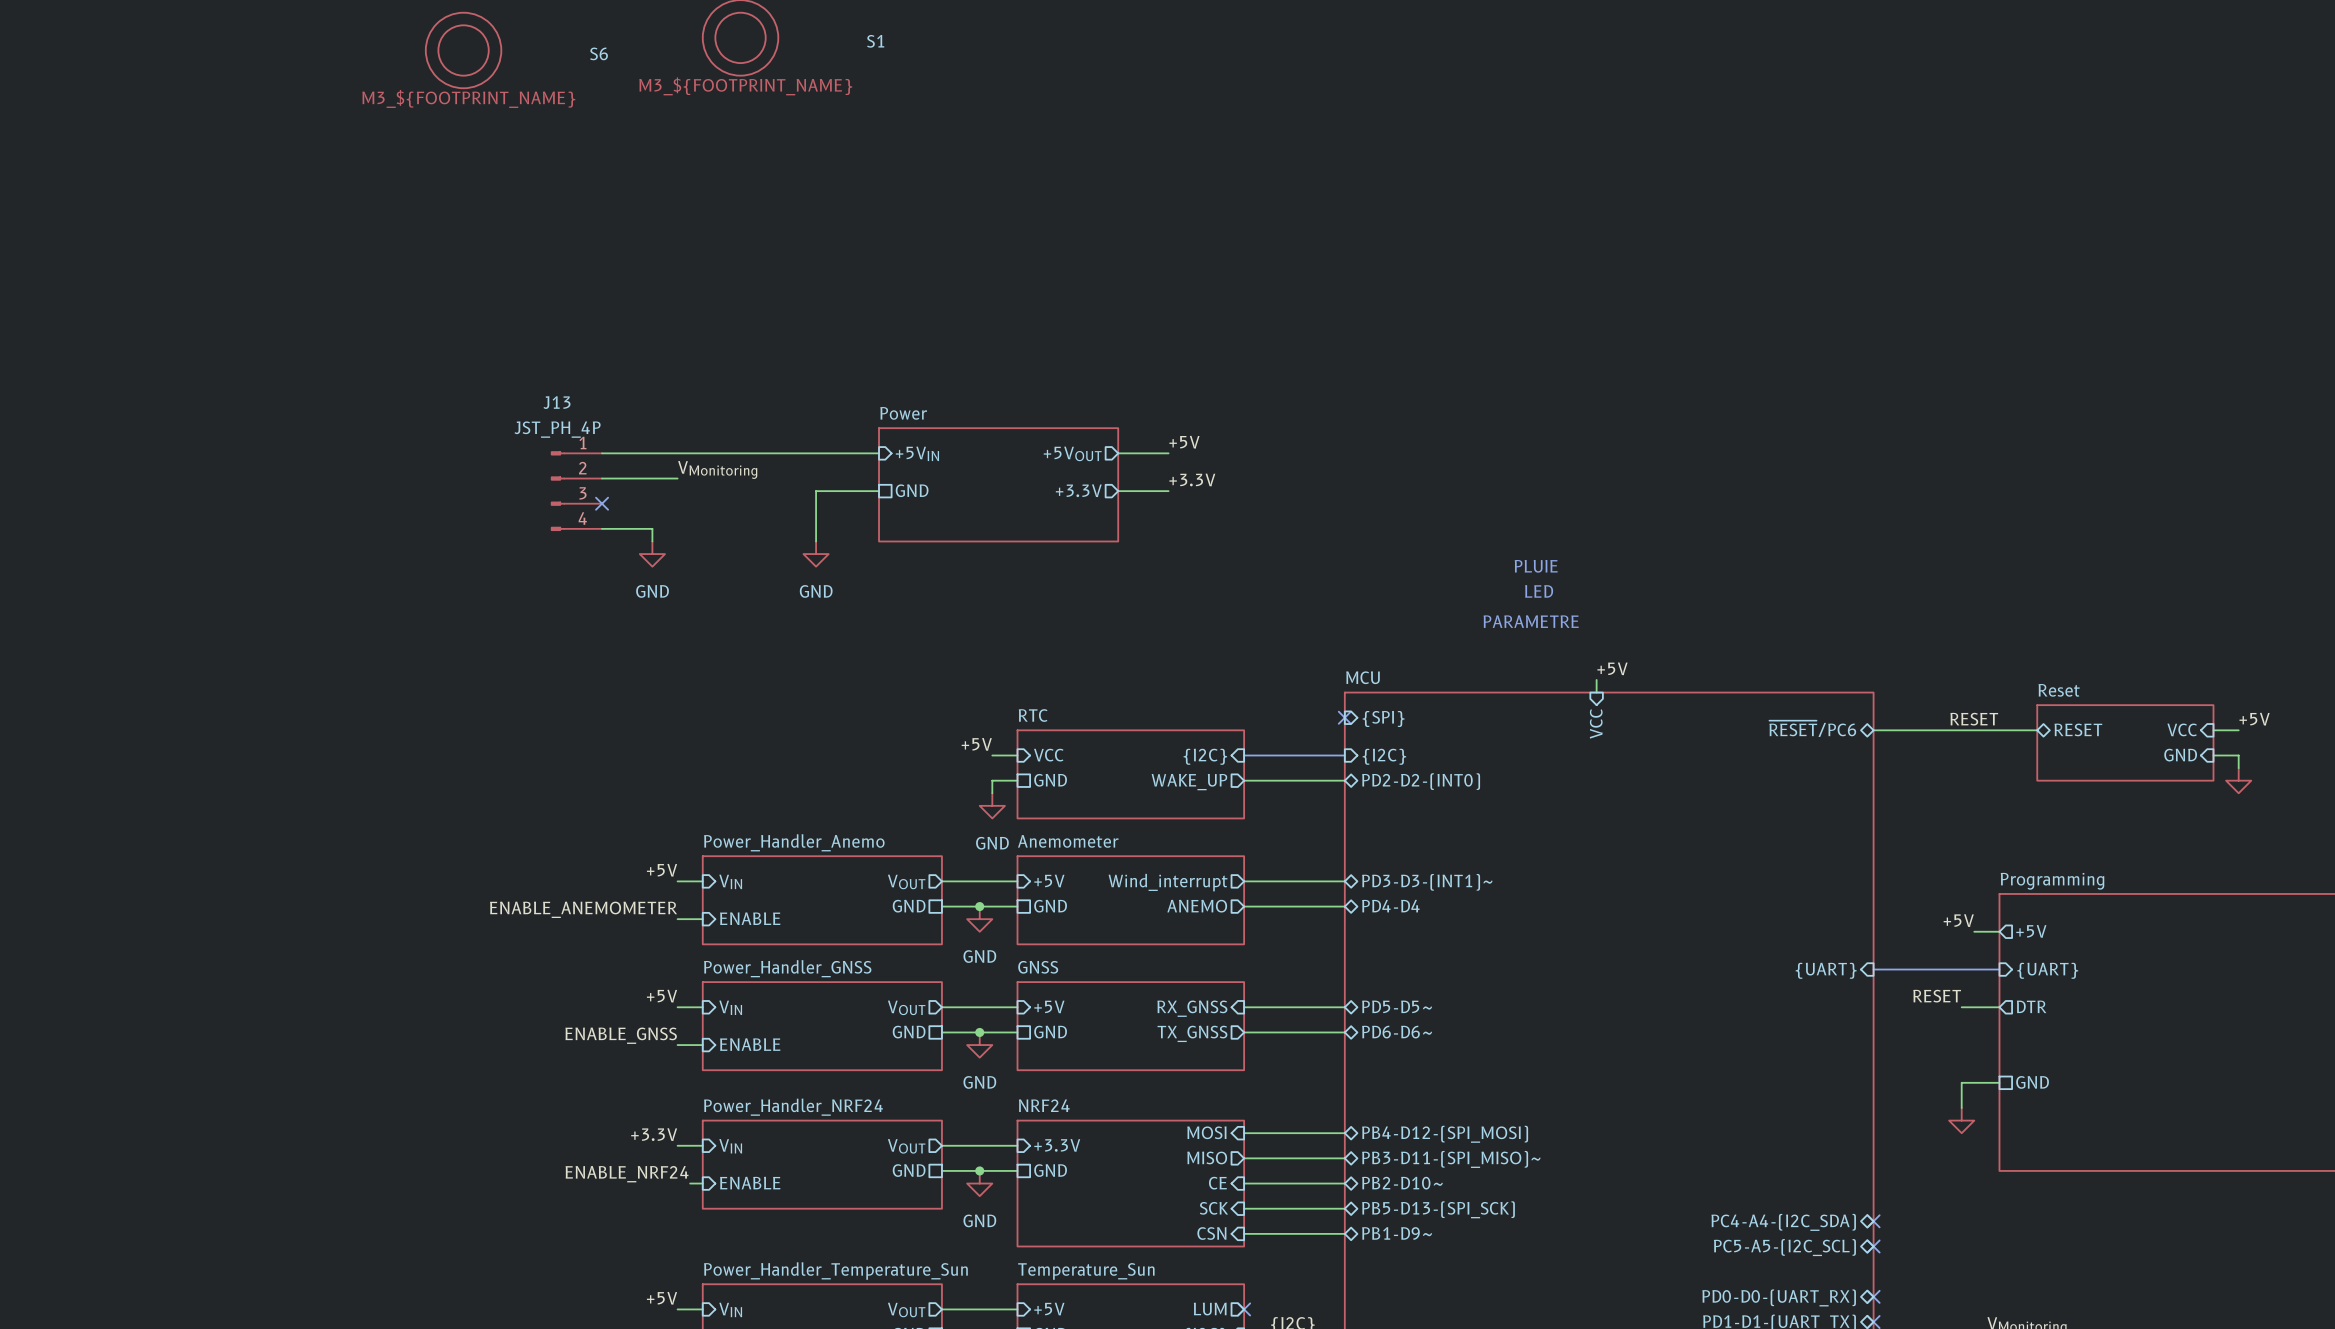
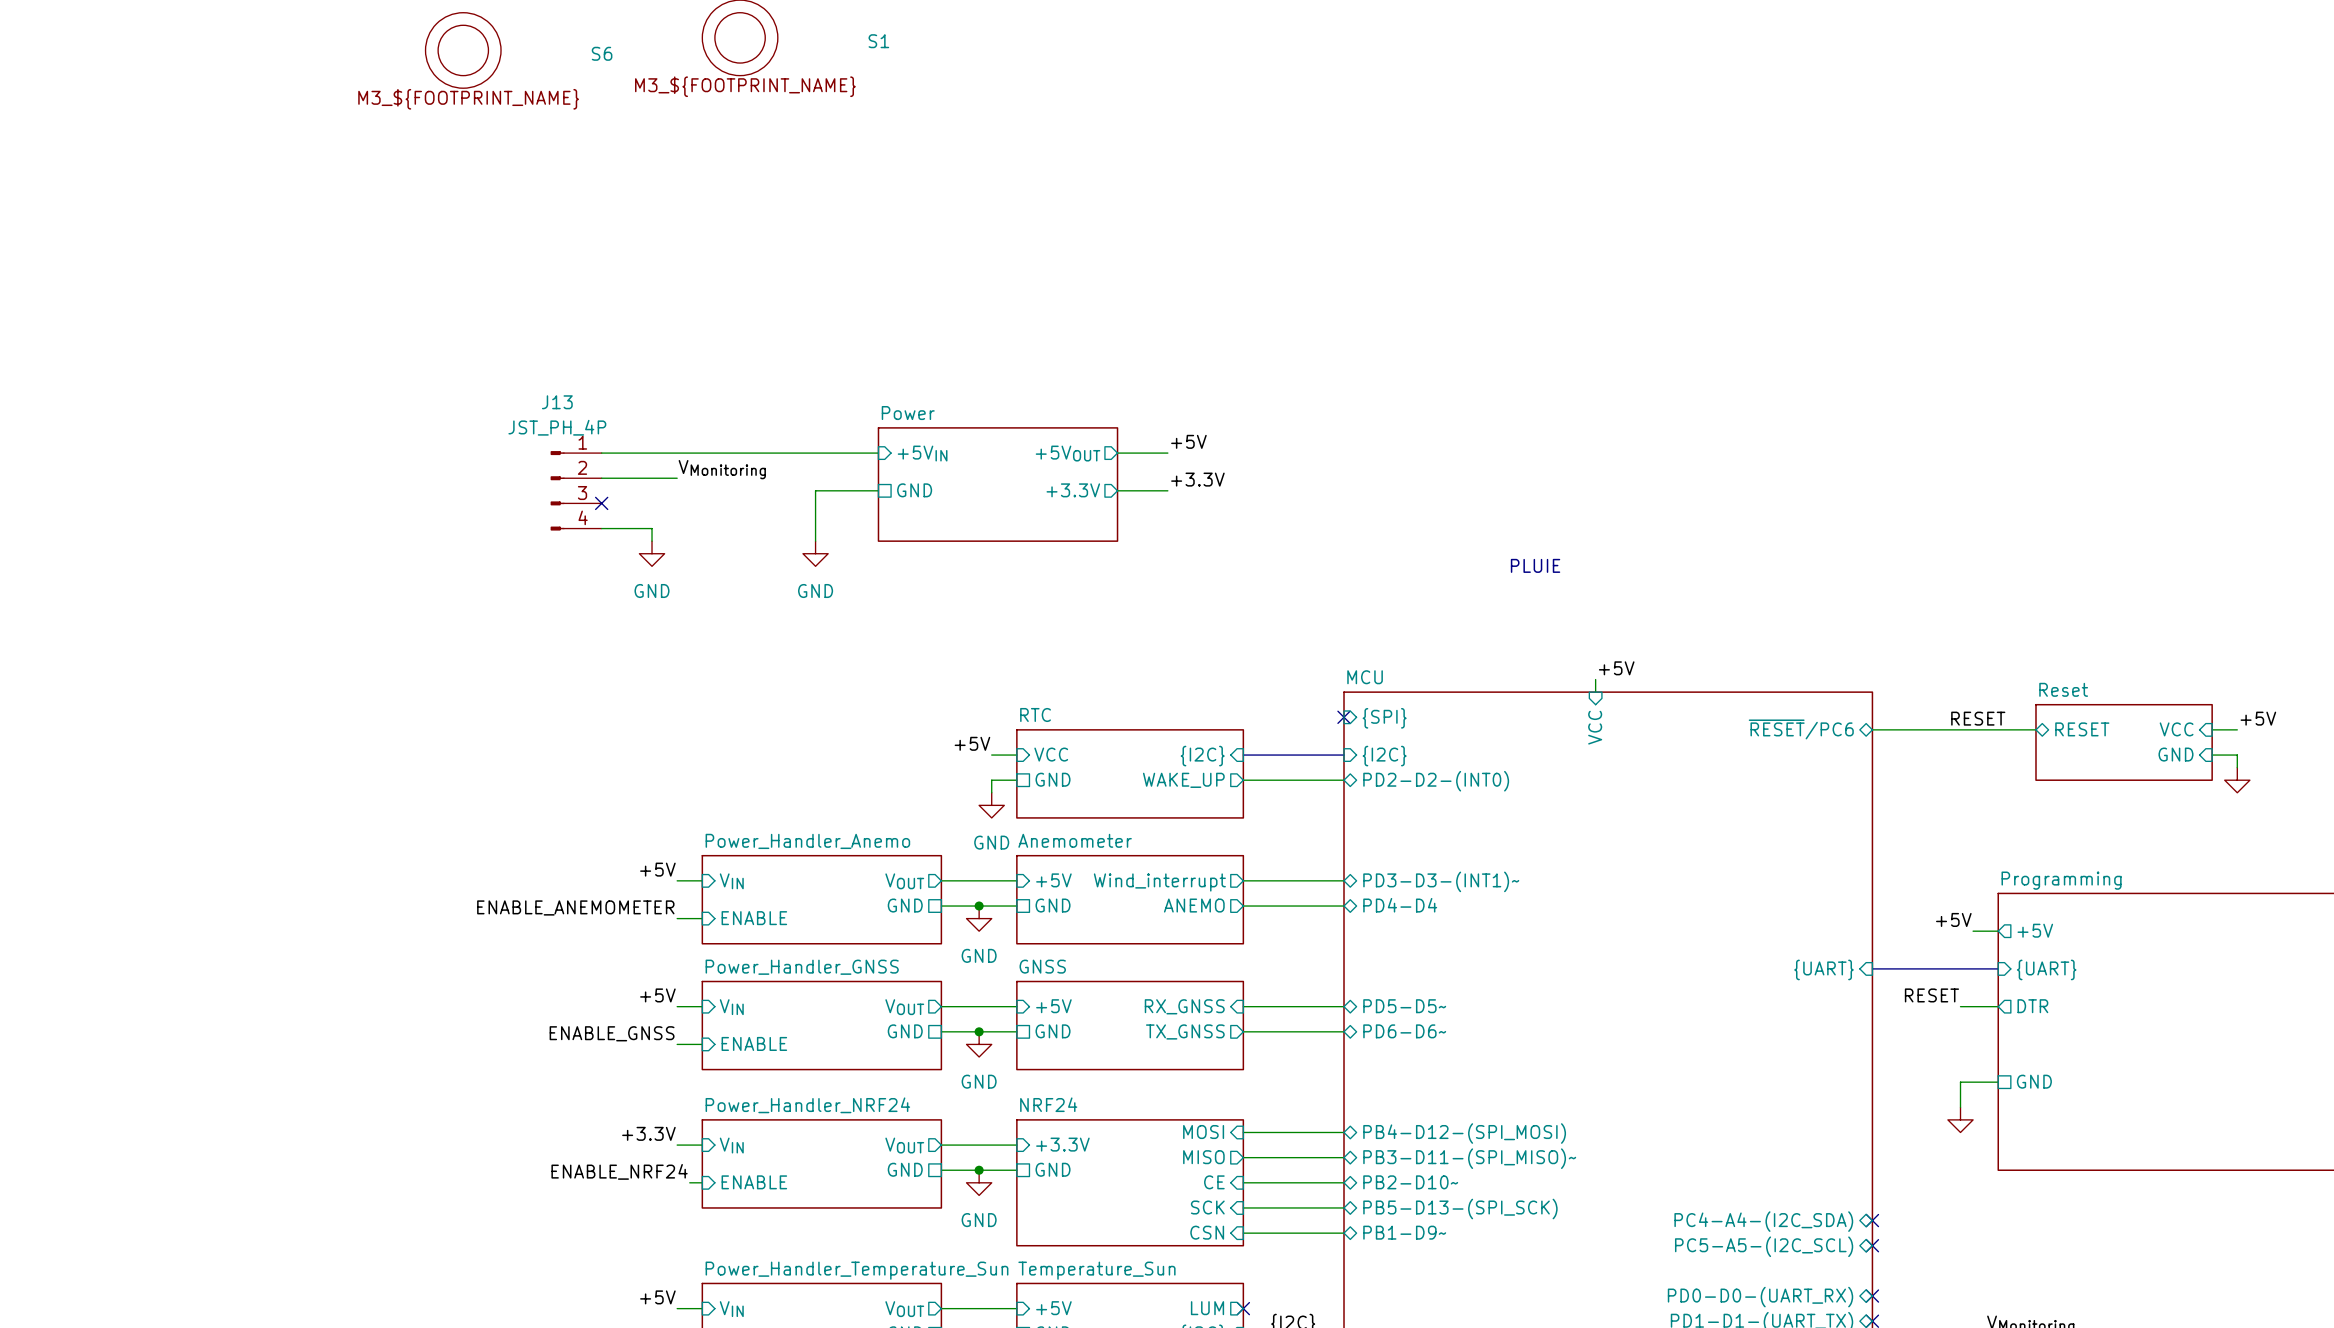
text: LED (1539, 591) -> none
text: PARAMETRE (1531, 621) -> none

